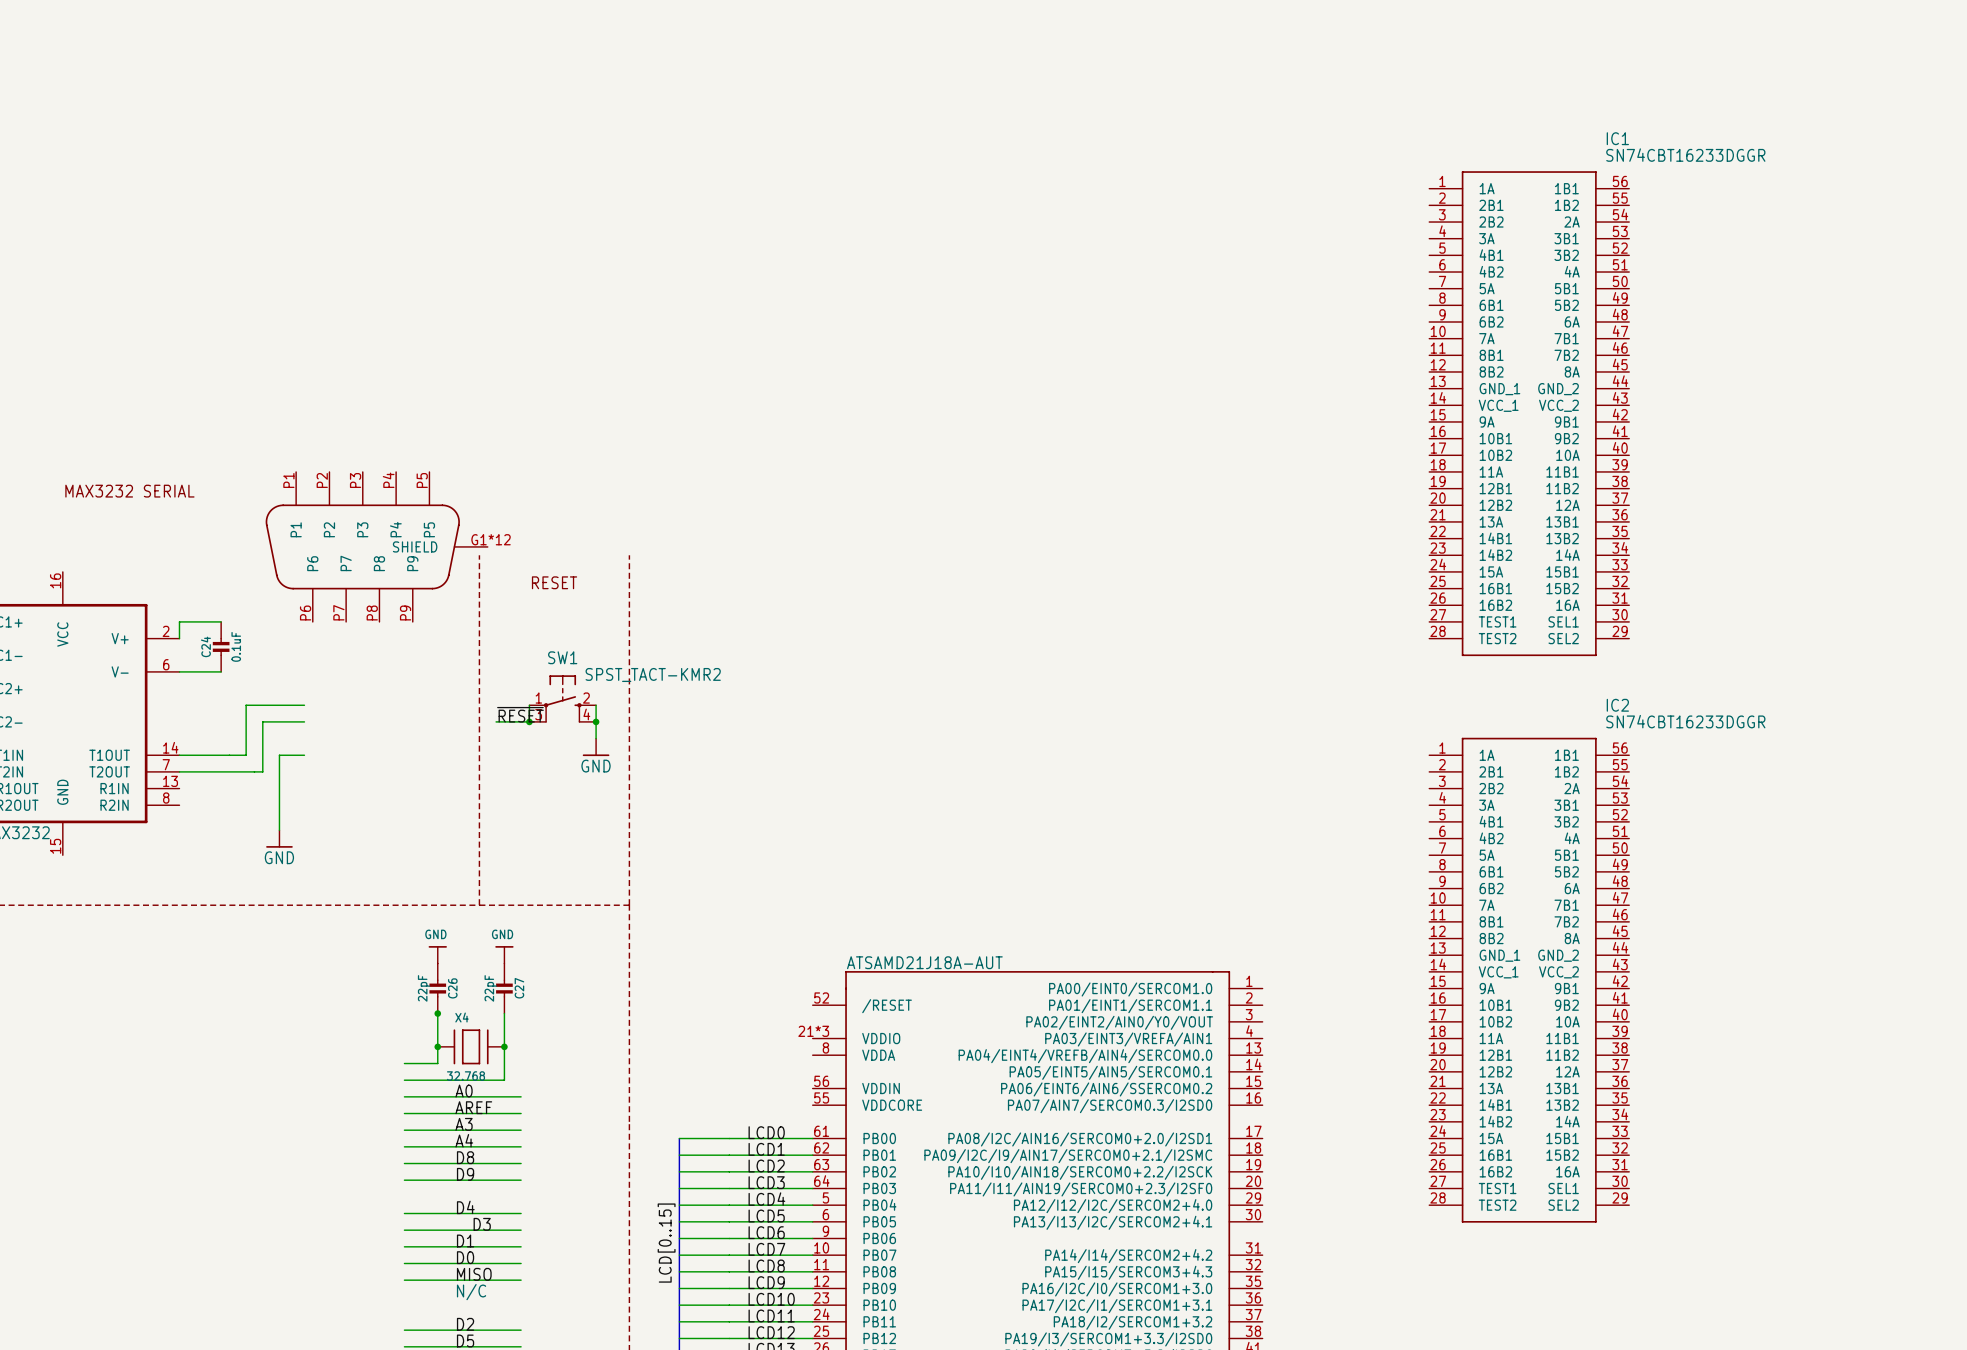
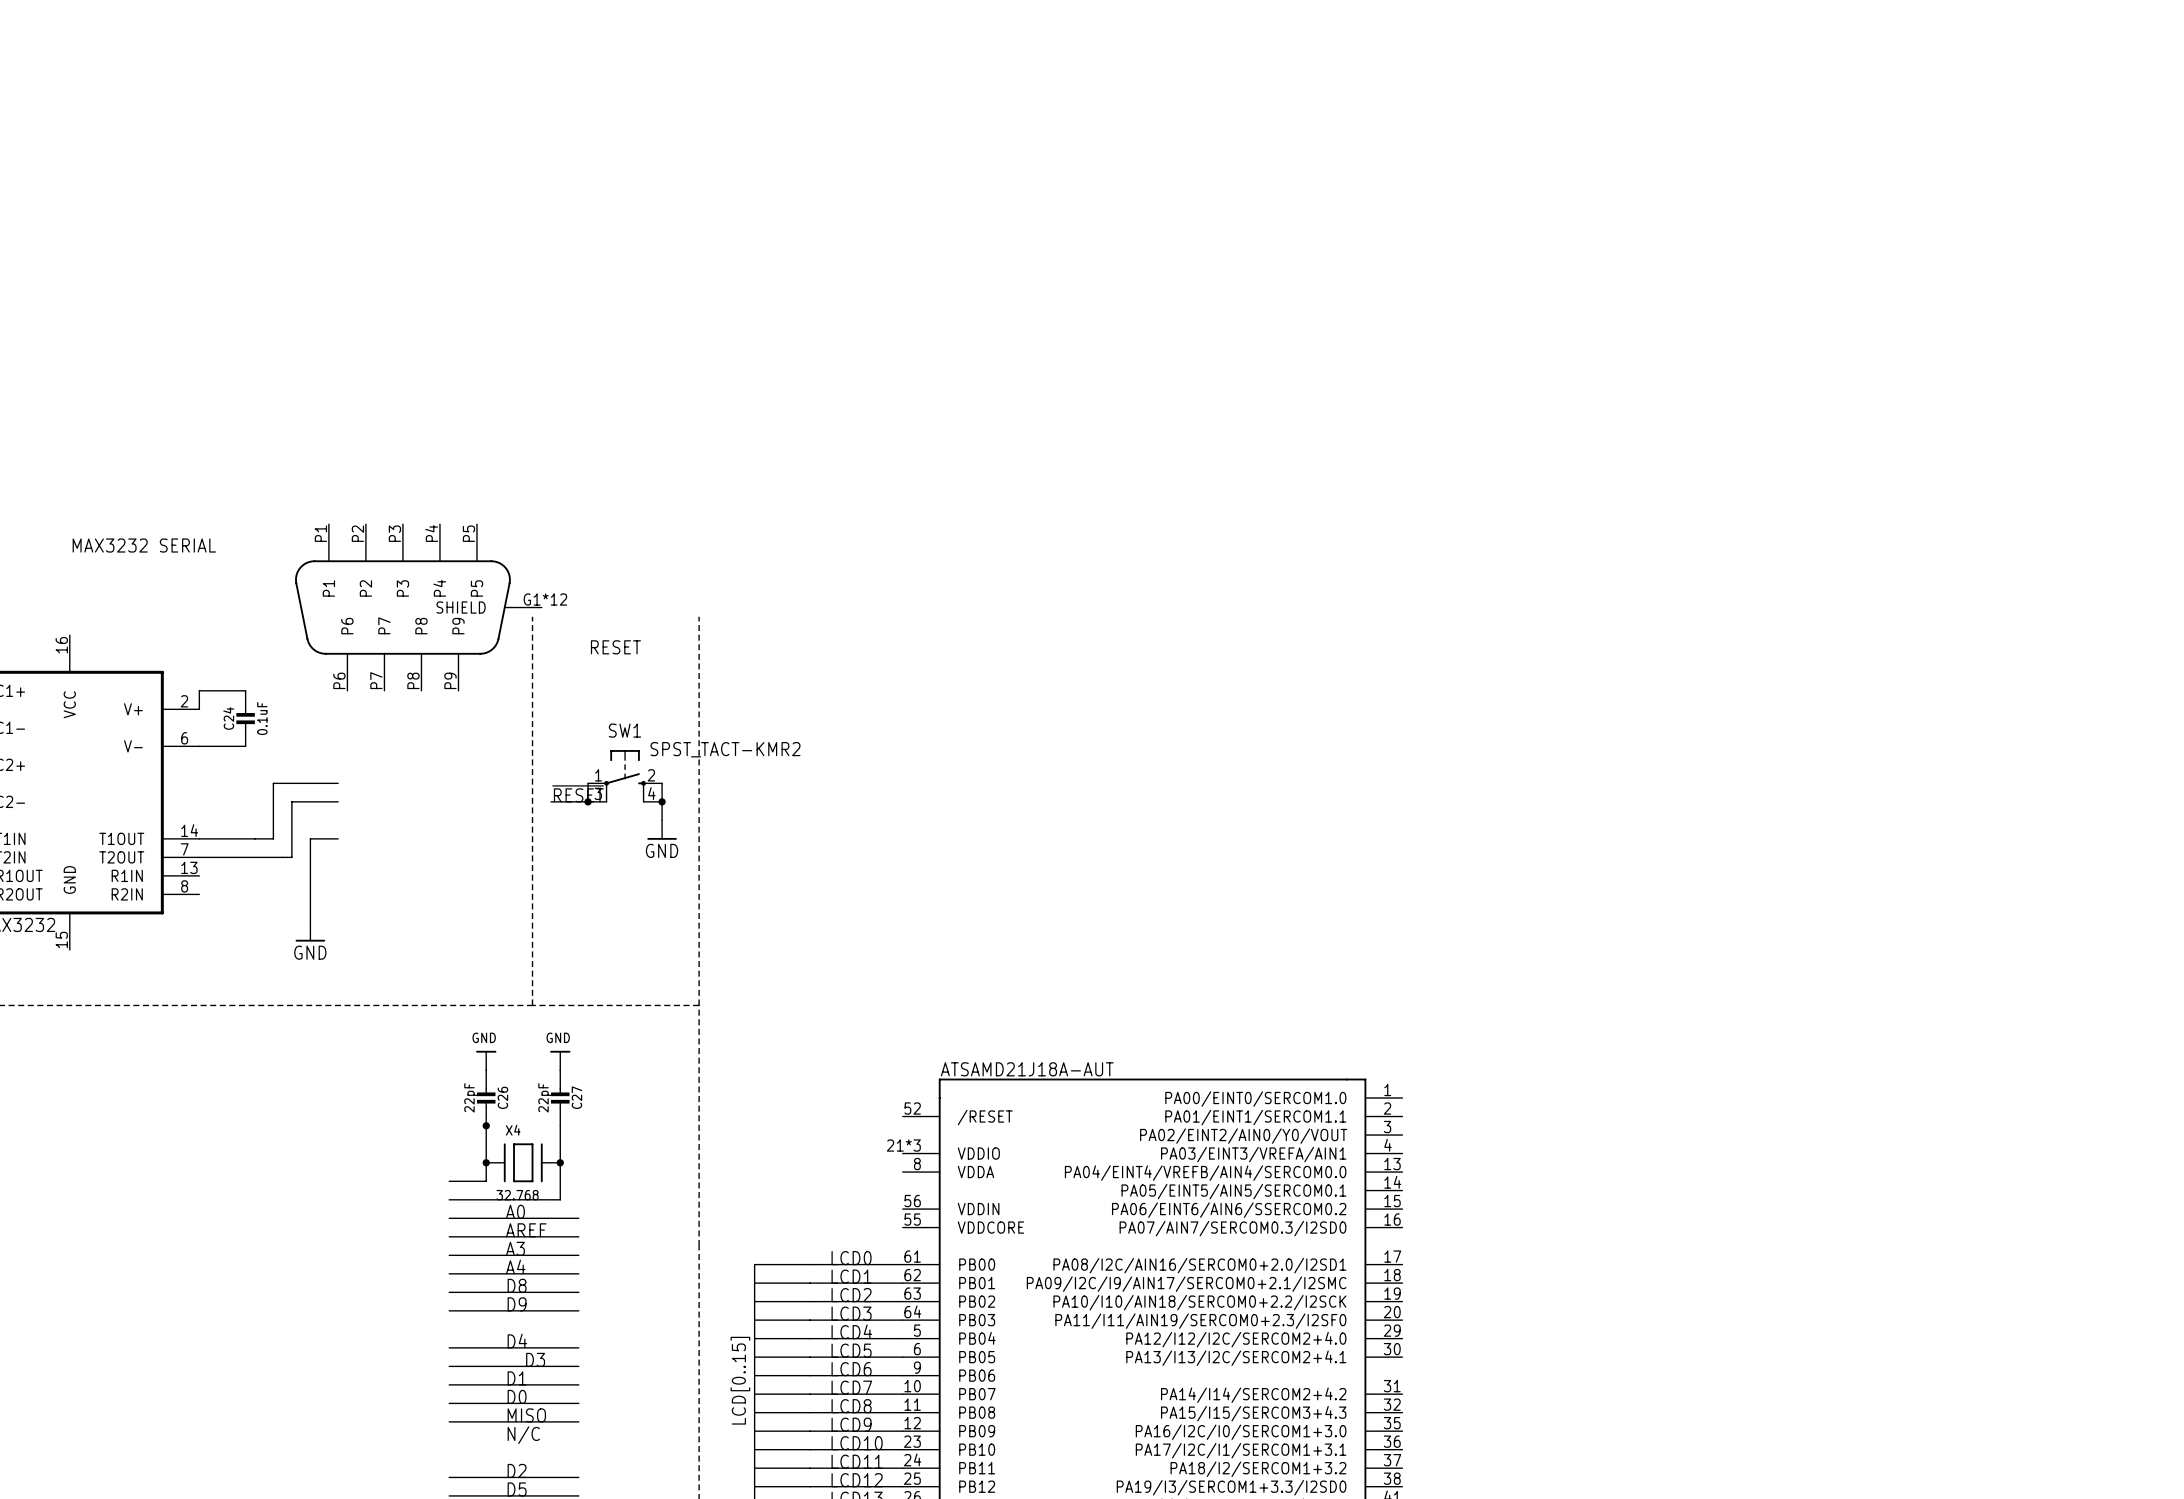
IC1: SN74CBT16233DGGR (1529, 413) -> none
IC2: SN74CBT16233DGGR (1529, 980) -> none

